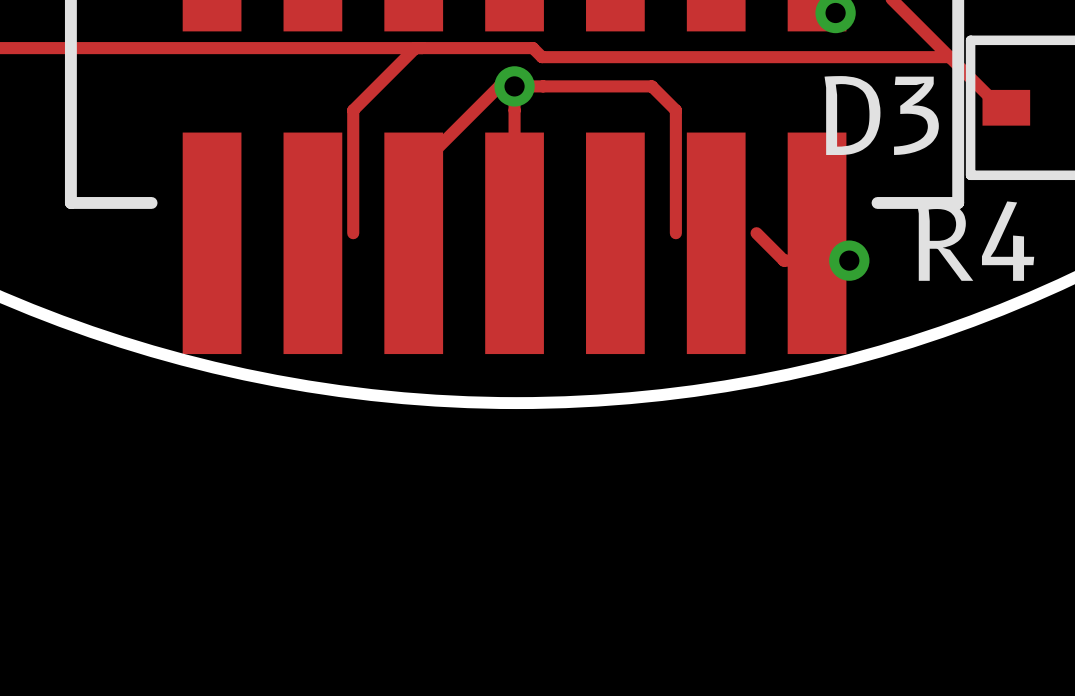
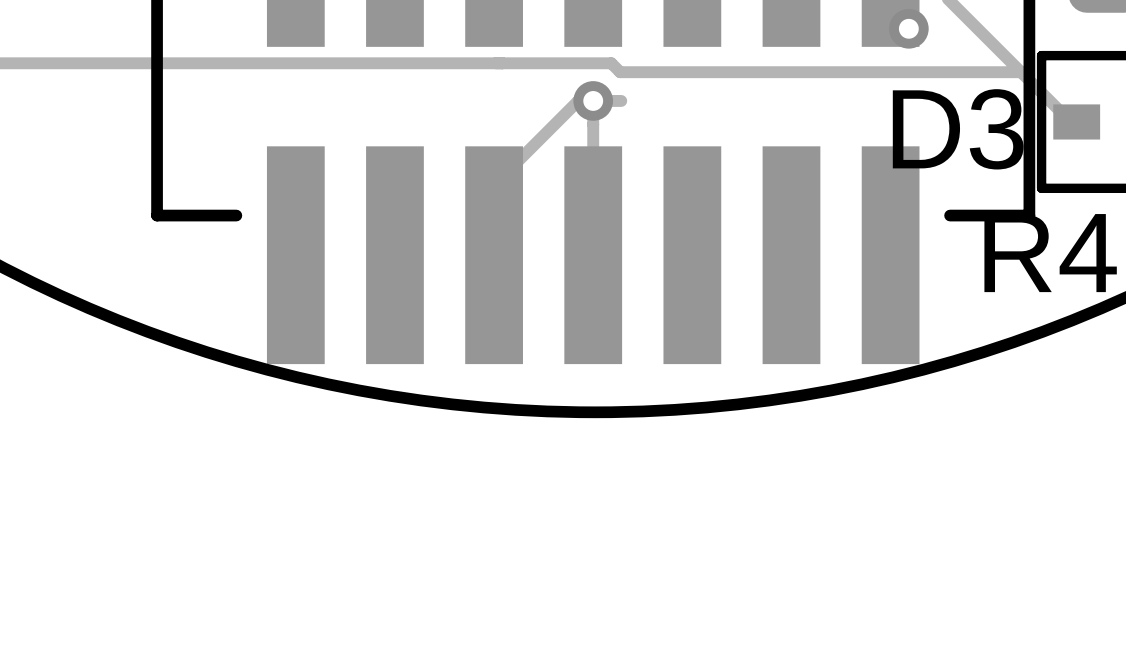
track: (415, 48) (353, 110) (353, 233) -> none
track: (543, 86) (651, 86) (675, 110) (675, 233) -> none
track: (756, 233) (783, 260) (849, 260) -> none
via: (849, 260) -> none

